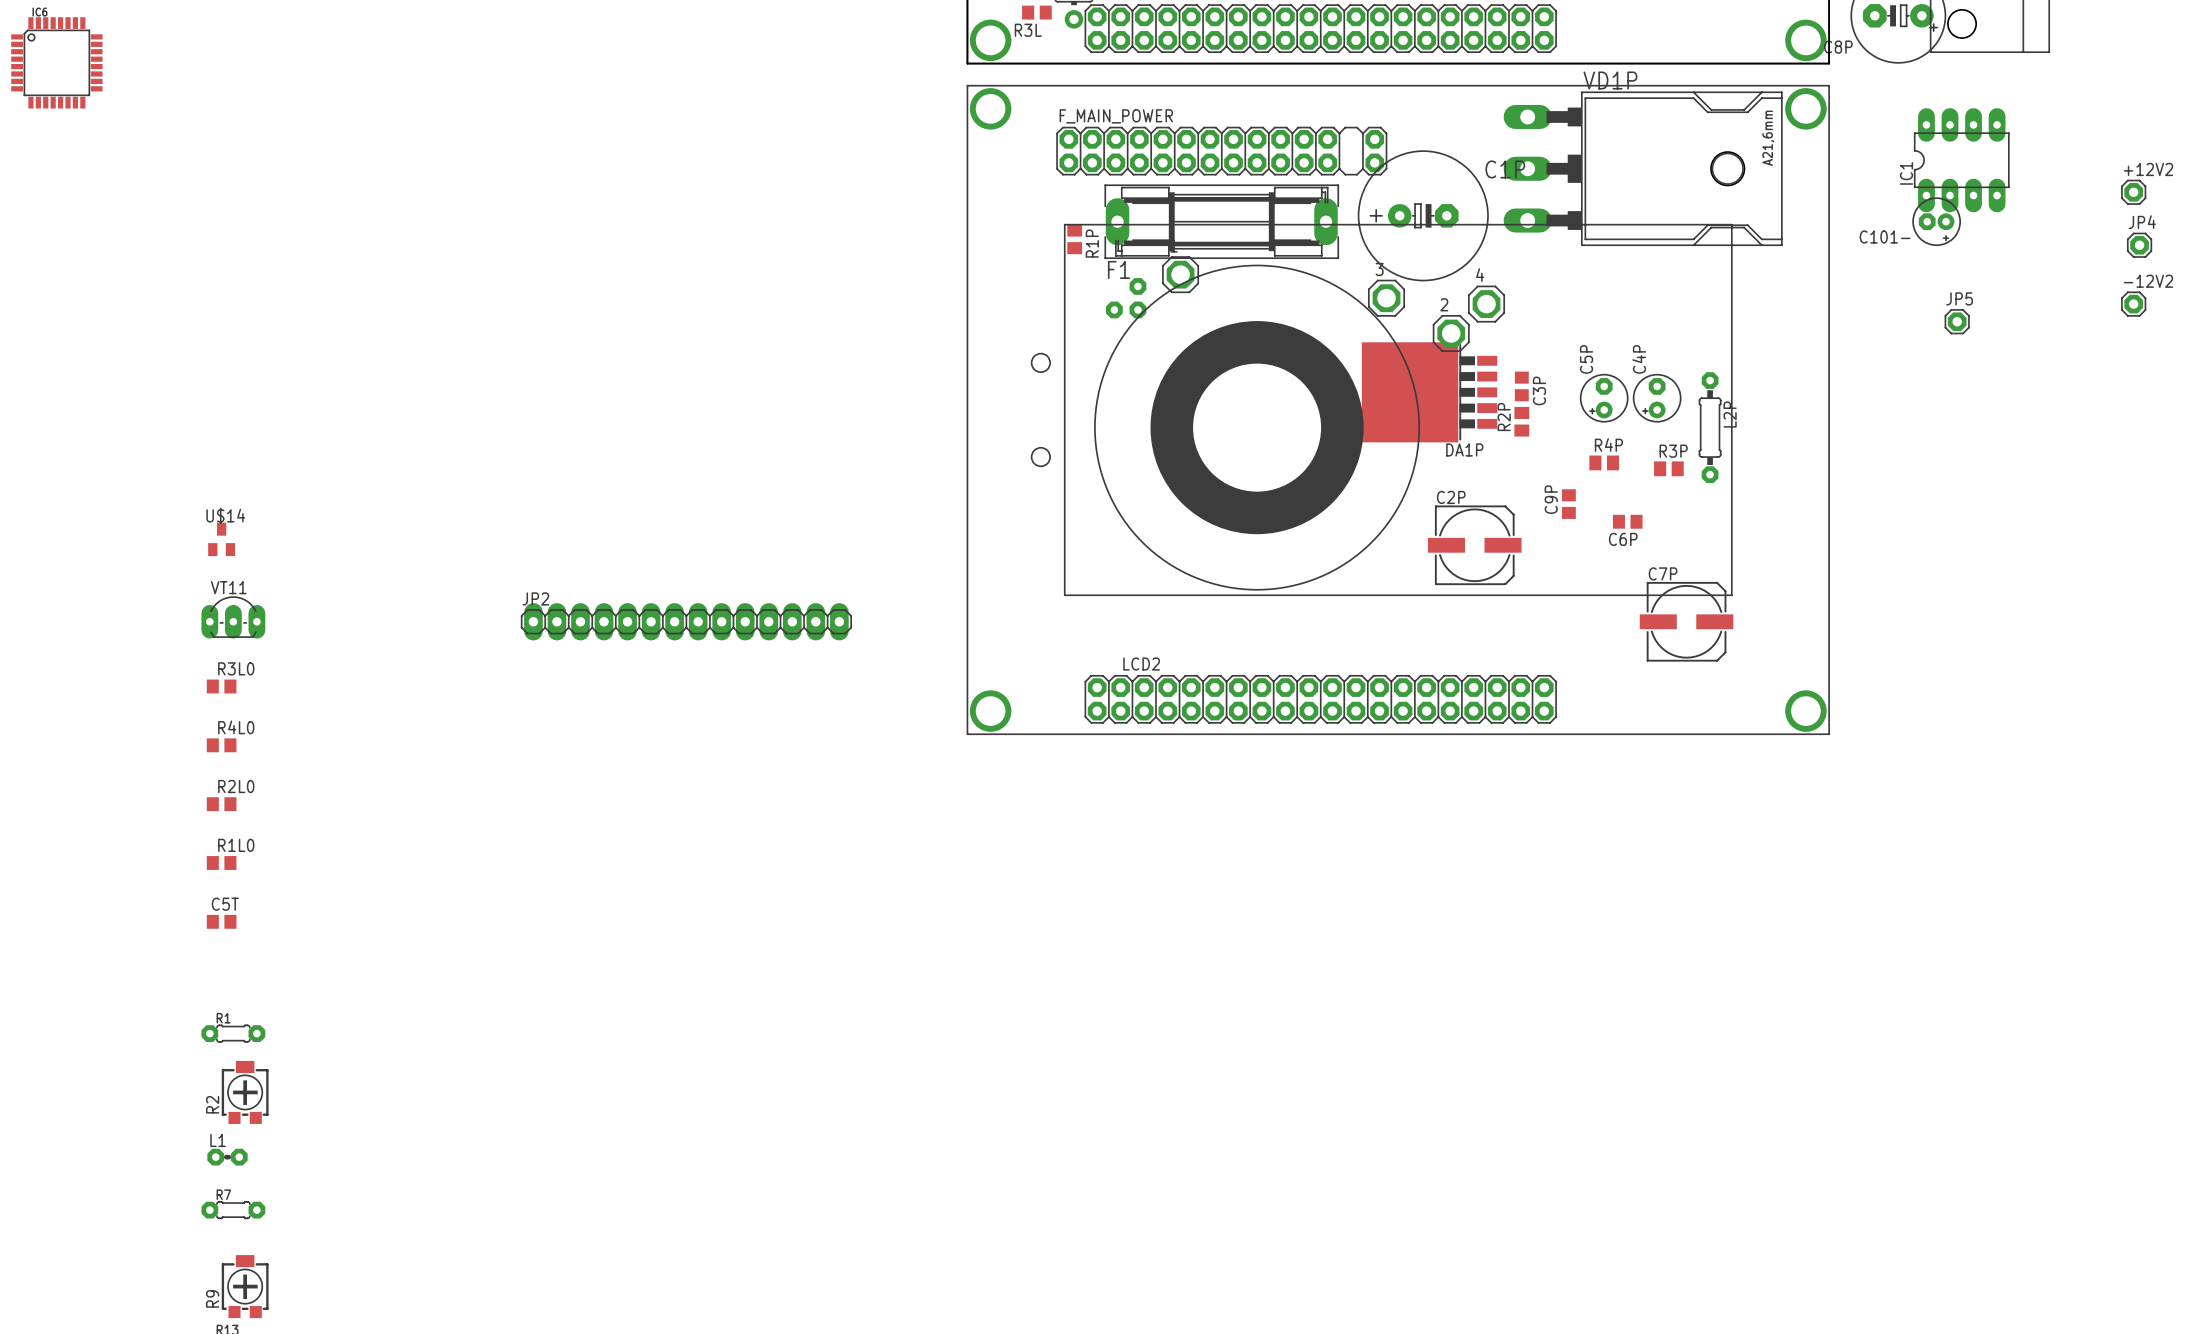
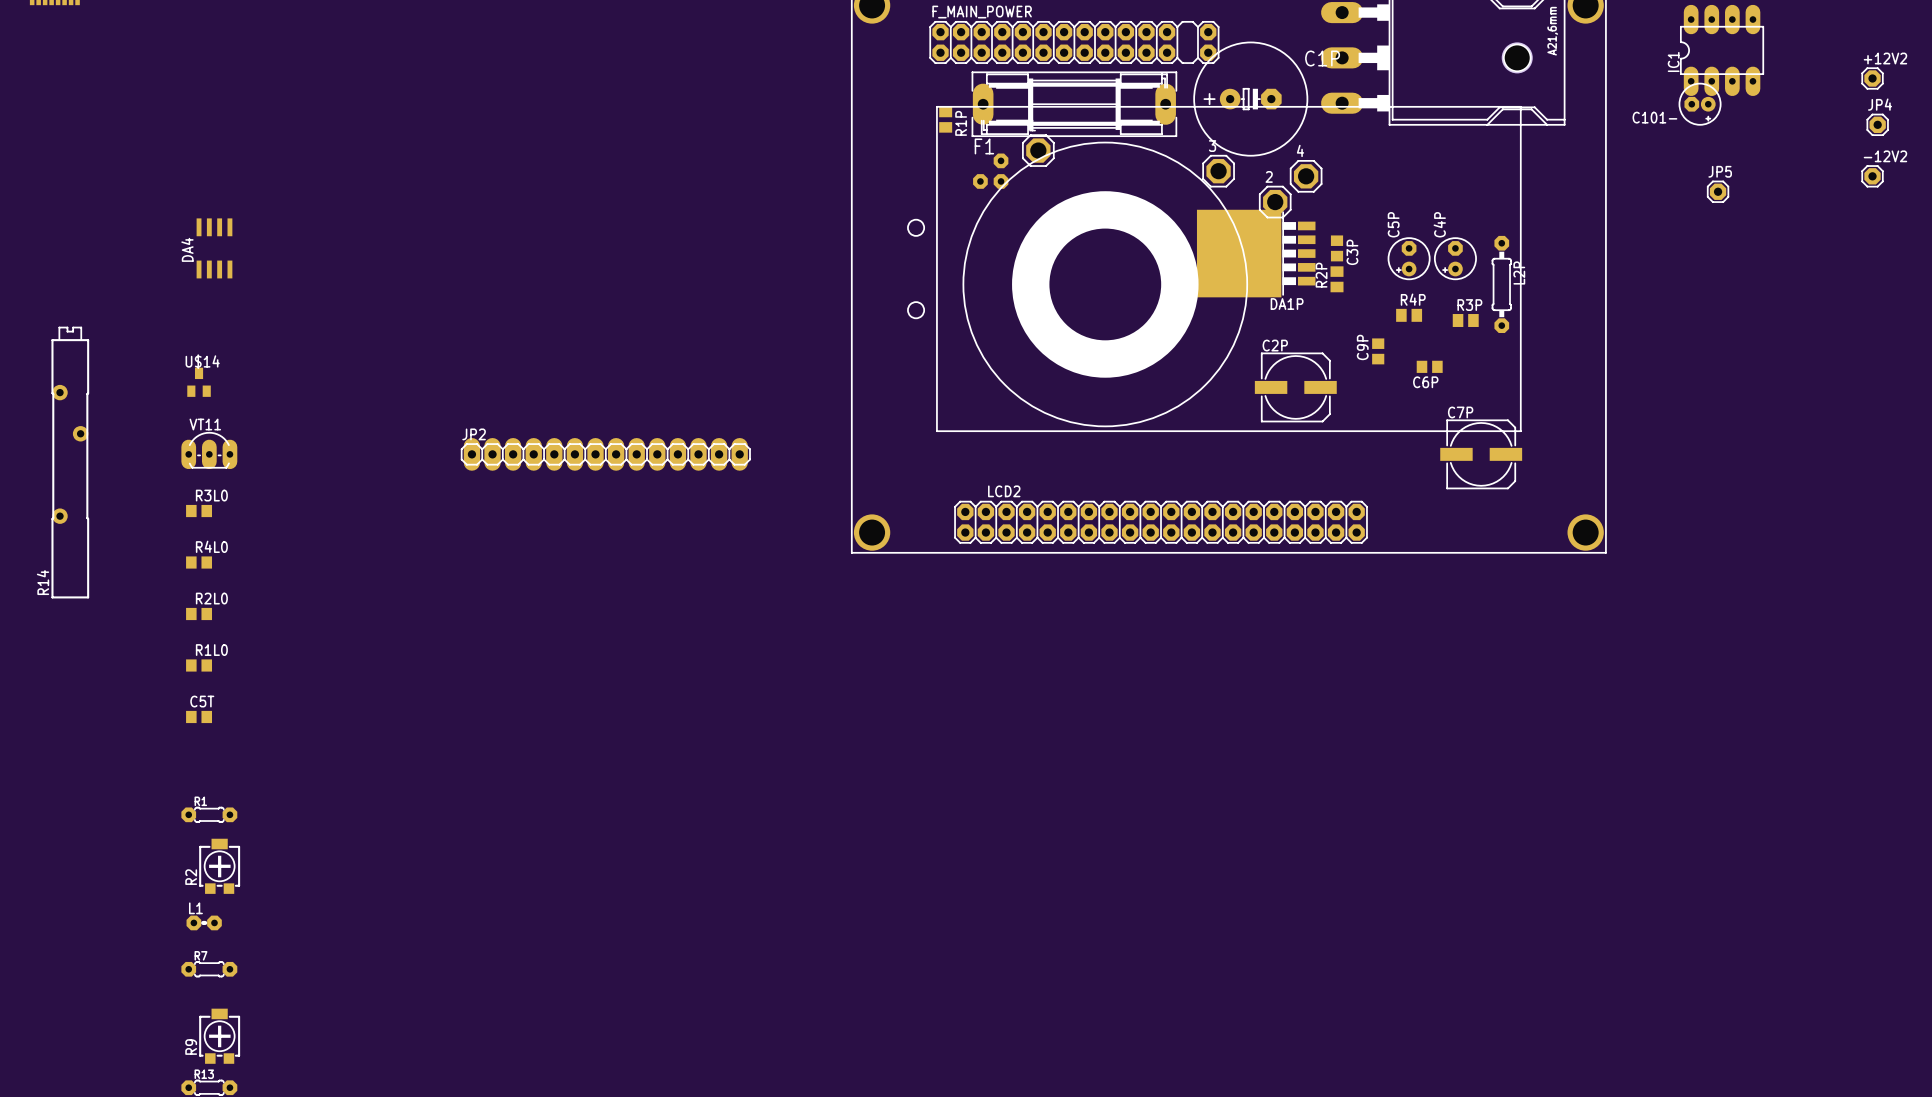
DA4: none -> (214, 248)
R14: none -> (70, 462)

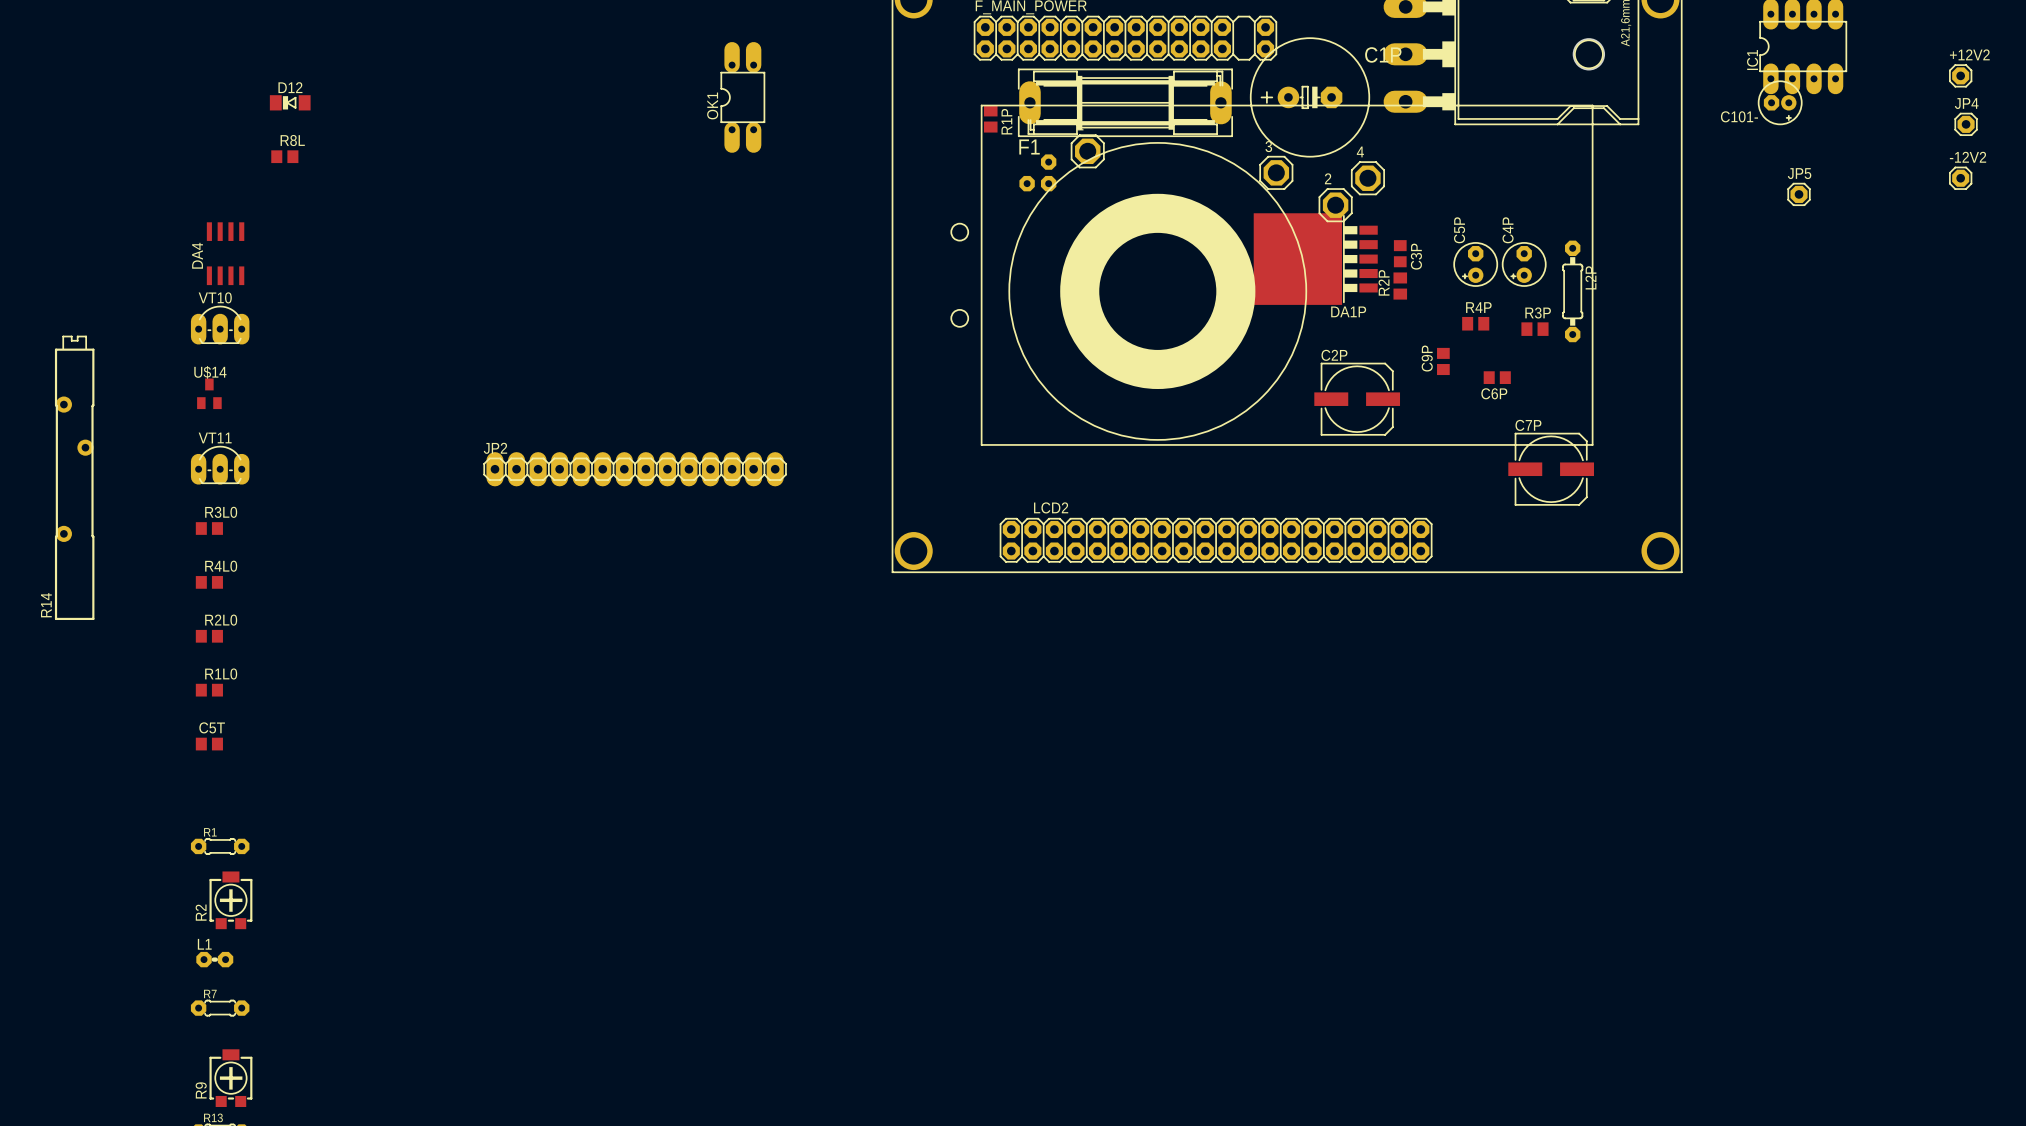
OK1: none -> (742, 97)
D12: none -> (290, 102)
R8L: none -> (284, 156)
VT10: none -> (220, 325)

